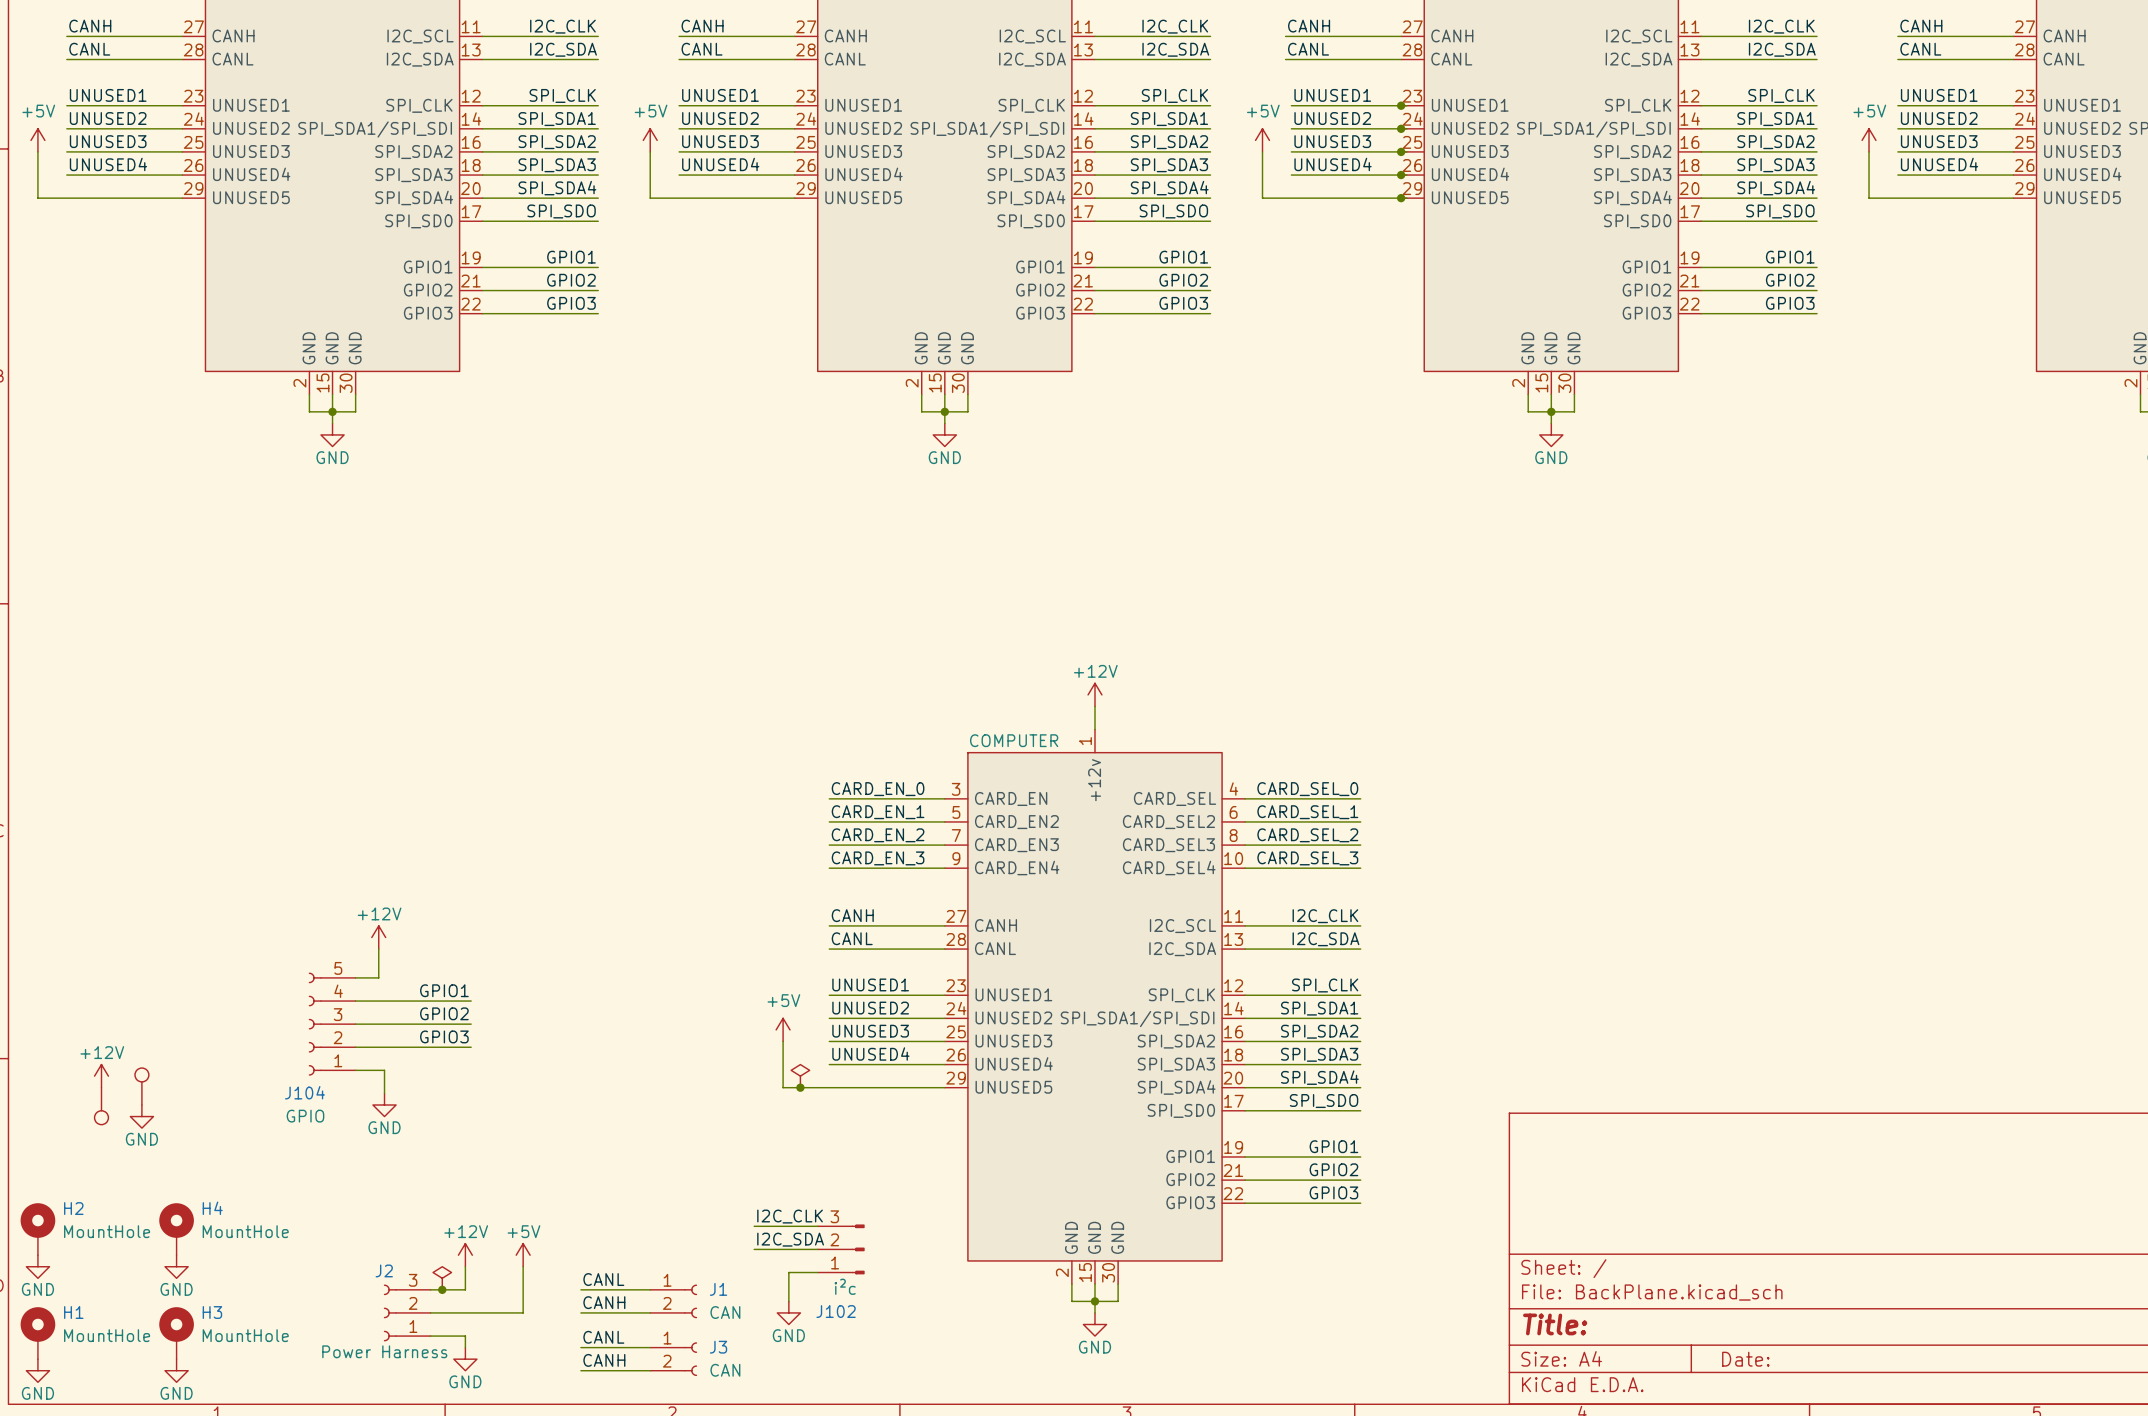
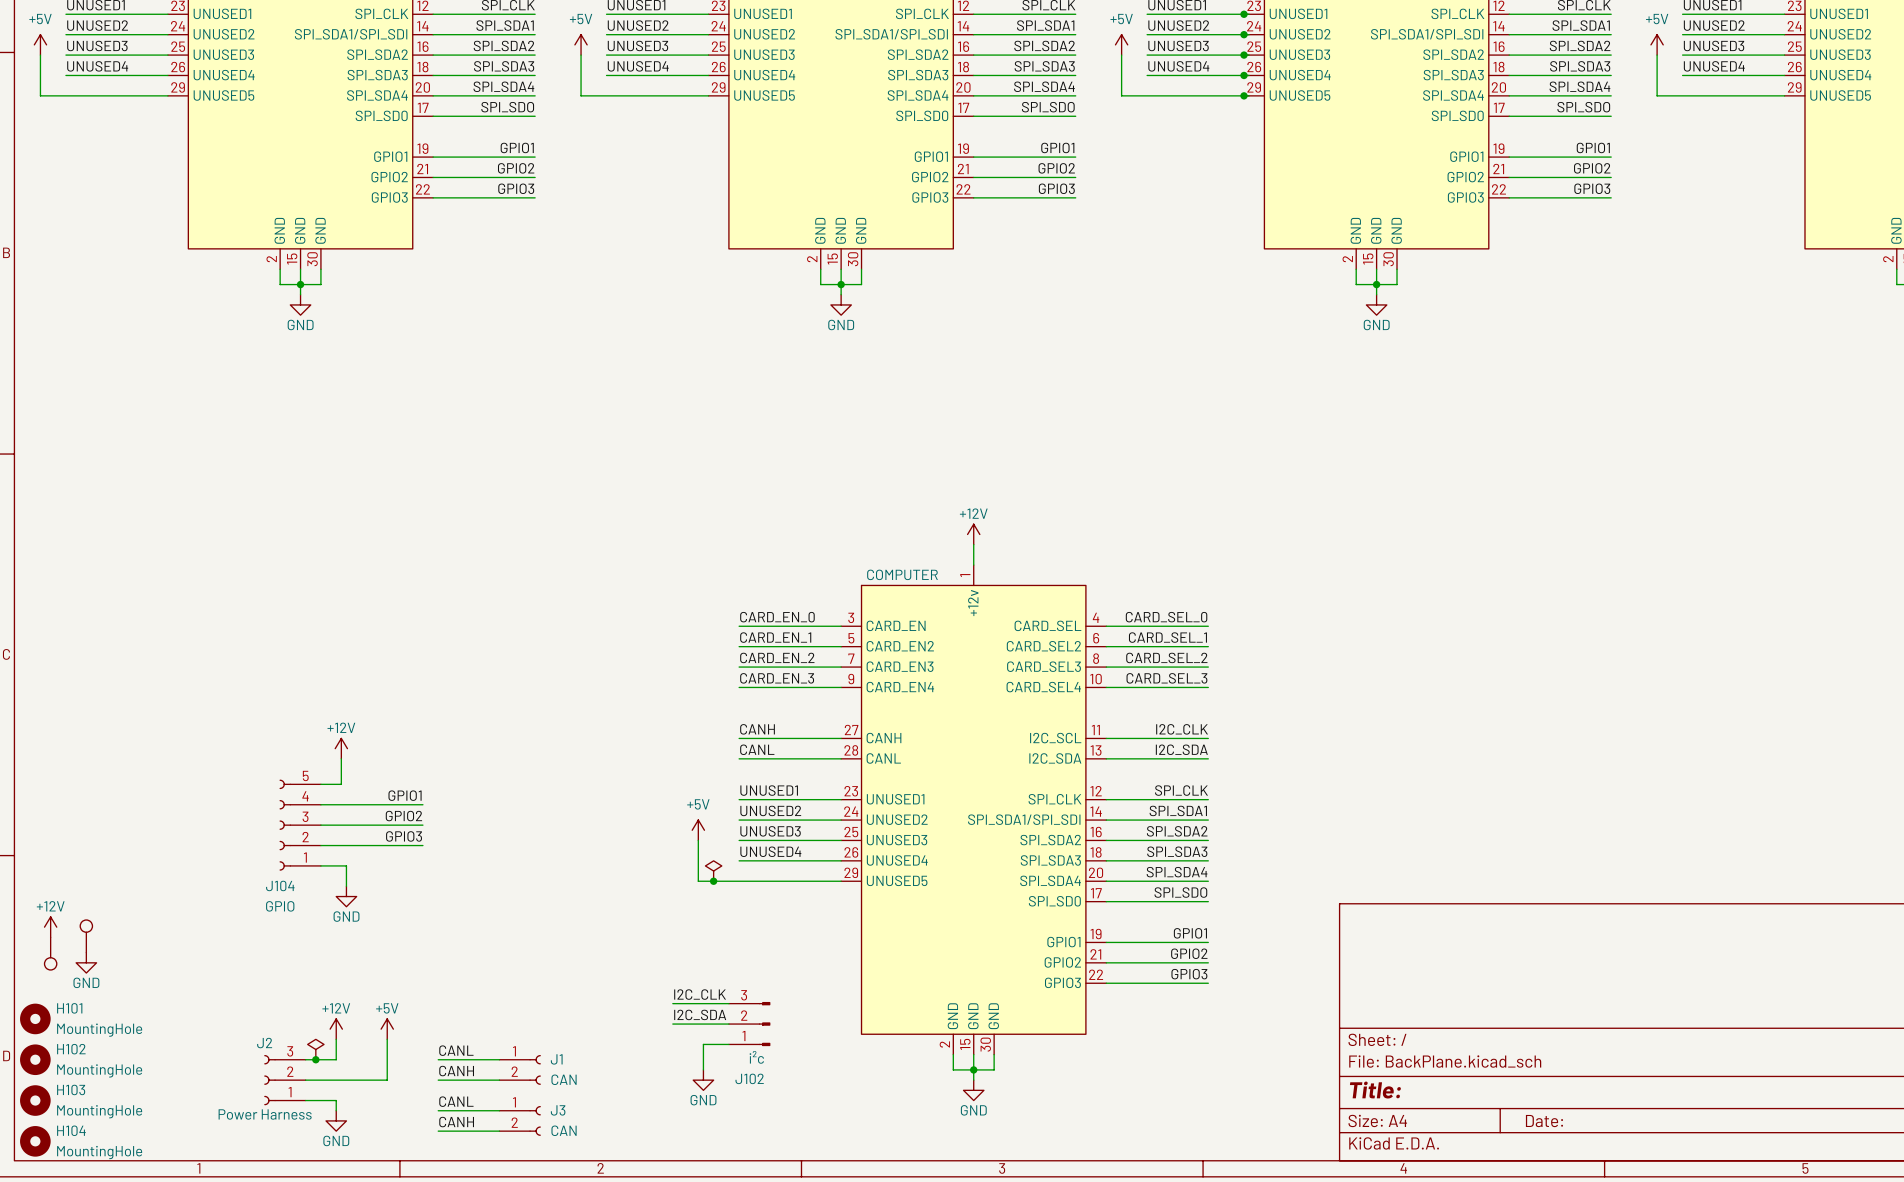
power symbol position: +12V (101, 1076) -> +12V (50, 927)
part: (141, 1086) -> none
part: (101, 1106) -> none
power symbol: GND (141, 1116) -> none
part: none -> (86, 936)
part: none -> (50, 953)
power symbol: none -> GND (86, 962)
H2: MountHole (37, 1229) -> none
H4: MountHole (176, 1229) -> none
H101: none -> MountingHole (35, 1018)
power symbol position: +12V (465, 1255) -> +12V (336, 1029)
power symbol position: +5V (523, 1255) -> +5V (387, 1029)
power symbol: GND (37, 1266) -> none
power symbol: GND (176, 1266) -> none
wire: none -> (387, 1039) (387, 1080) (305, 1080)
wire: (465, 1266) (465, 1289) (430, 1289) -> (336, 1039) (336, 1059) (305, 1059)
wire: (523, 1266) (523, 1312) -> (499, 1080) (468, 1080)
power symbol position: (442, 1278) -> (315, 1049)
label: none -> CANL (456, 1050)
label: CANL (603, 1279) -> none
H102: none -> MountingHole (35, 1059)
junction: none -> (315, 1059)
junction: (442, 1289) -> none
wire: (580, 1289) (650, 1289) -> (438, 1059) (499, 1059)
J1 position: (673, 1301) -> (520, 1069)
label: none -> CANH (456, 1071)
label: CANH (604, 1302) -> none
J2 position: (407, 1312) -> (284, 1080)
wire: (430, 1312) (488, 1312) -> none
wire: (580, 1312) (650, 1312) -> none
H1: MountHole (37, 1333) -> none
H3: MountHole (176, 1333) -> none
H103: none -> MountingHole (35, 1100)
wire: (430, 1336) (465, 1336) (465, 1347) -> (305, 1100) (336, 1100) (336, 1110)
label: none -> CANL (456, 1101)
label: CANL (603, 1337) -> none
wire: (580, 1347) (650, 1347) -> (438, 1110) (499, 1110)
power symbol position: GND (465, 1359) -> GND (336, 1120)
J3 position: (673, 1359) -> (520, 1120)
label: none -> CANH (456, 1122)
label: CANH (604, 1360) -> none
power symbol: GND (37, 1370) -> none
power symbol: GND (176, 1370) -> none
wire: (580, 1370) (650, 1370) -> (438, 1131) (499, 1131)
H104: none -> MountingHole (35, 1141)

